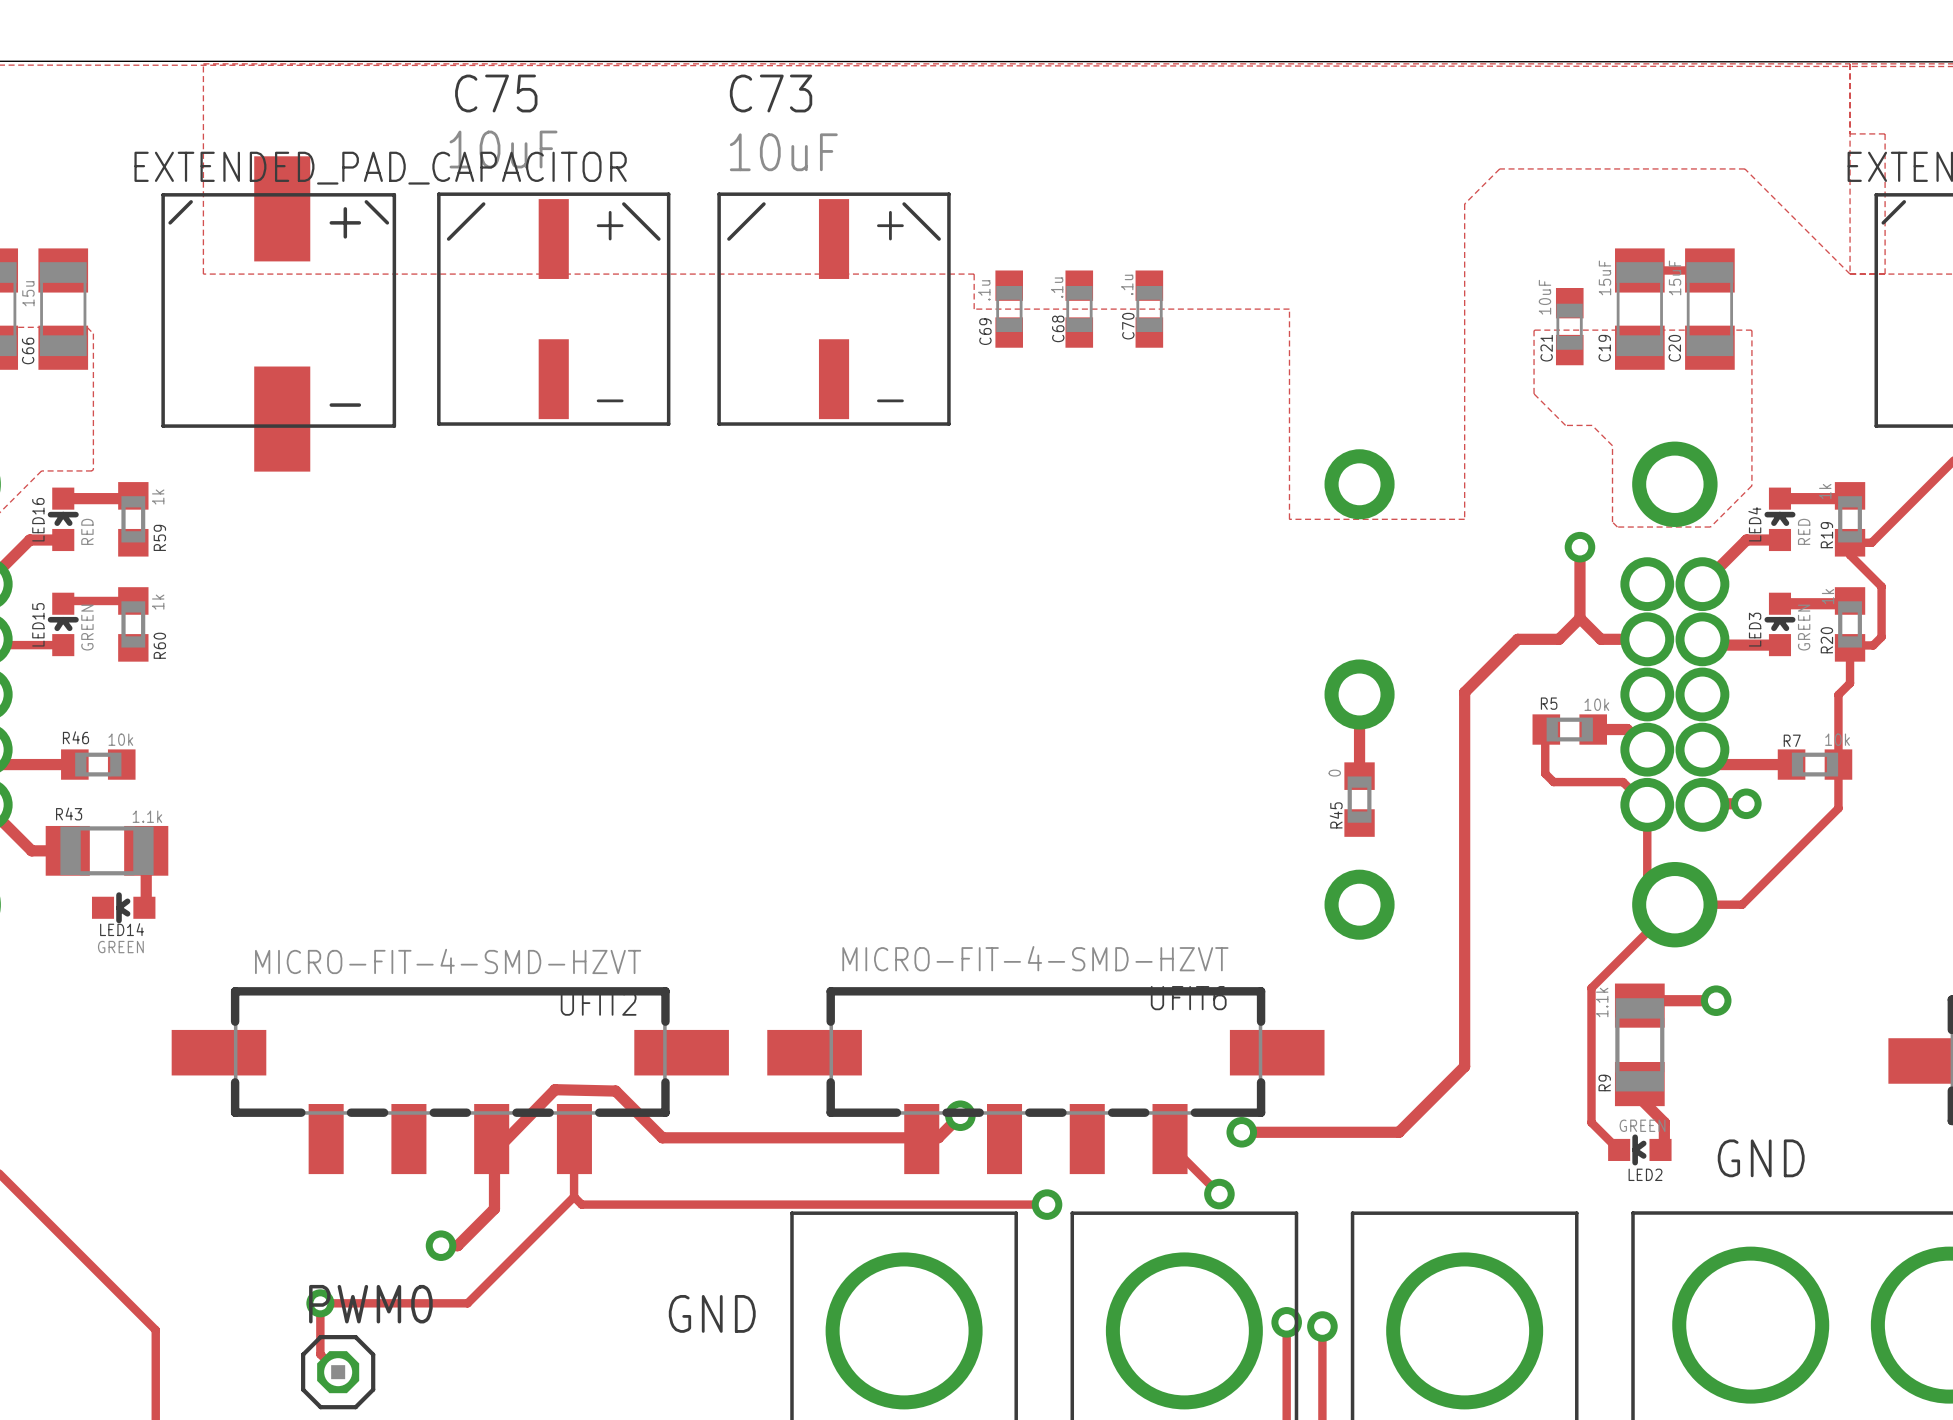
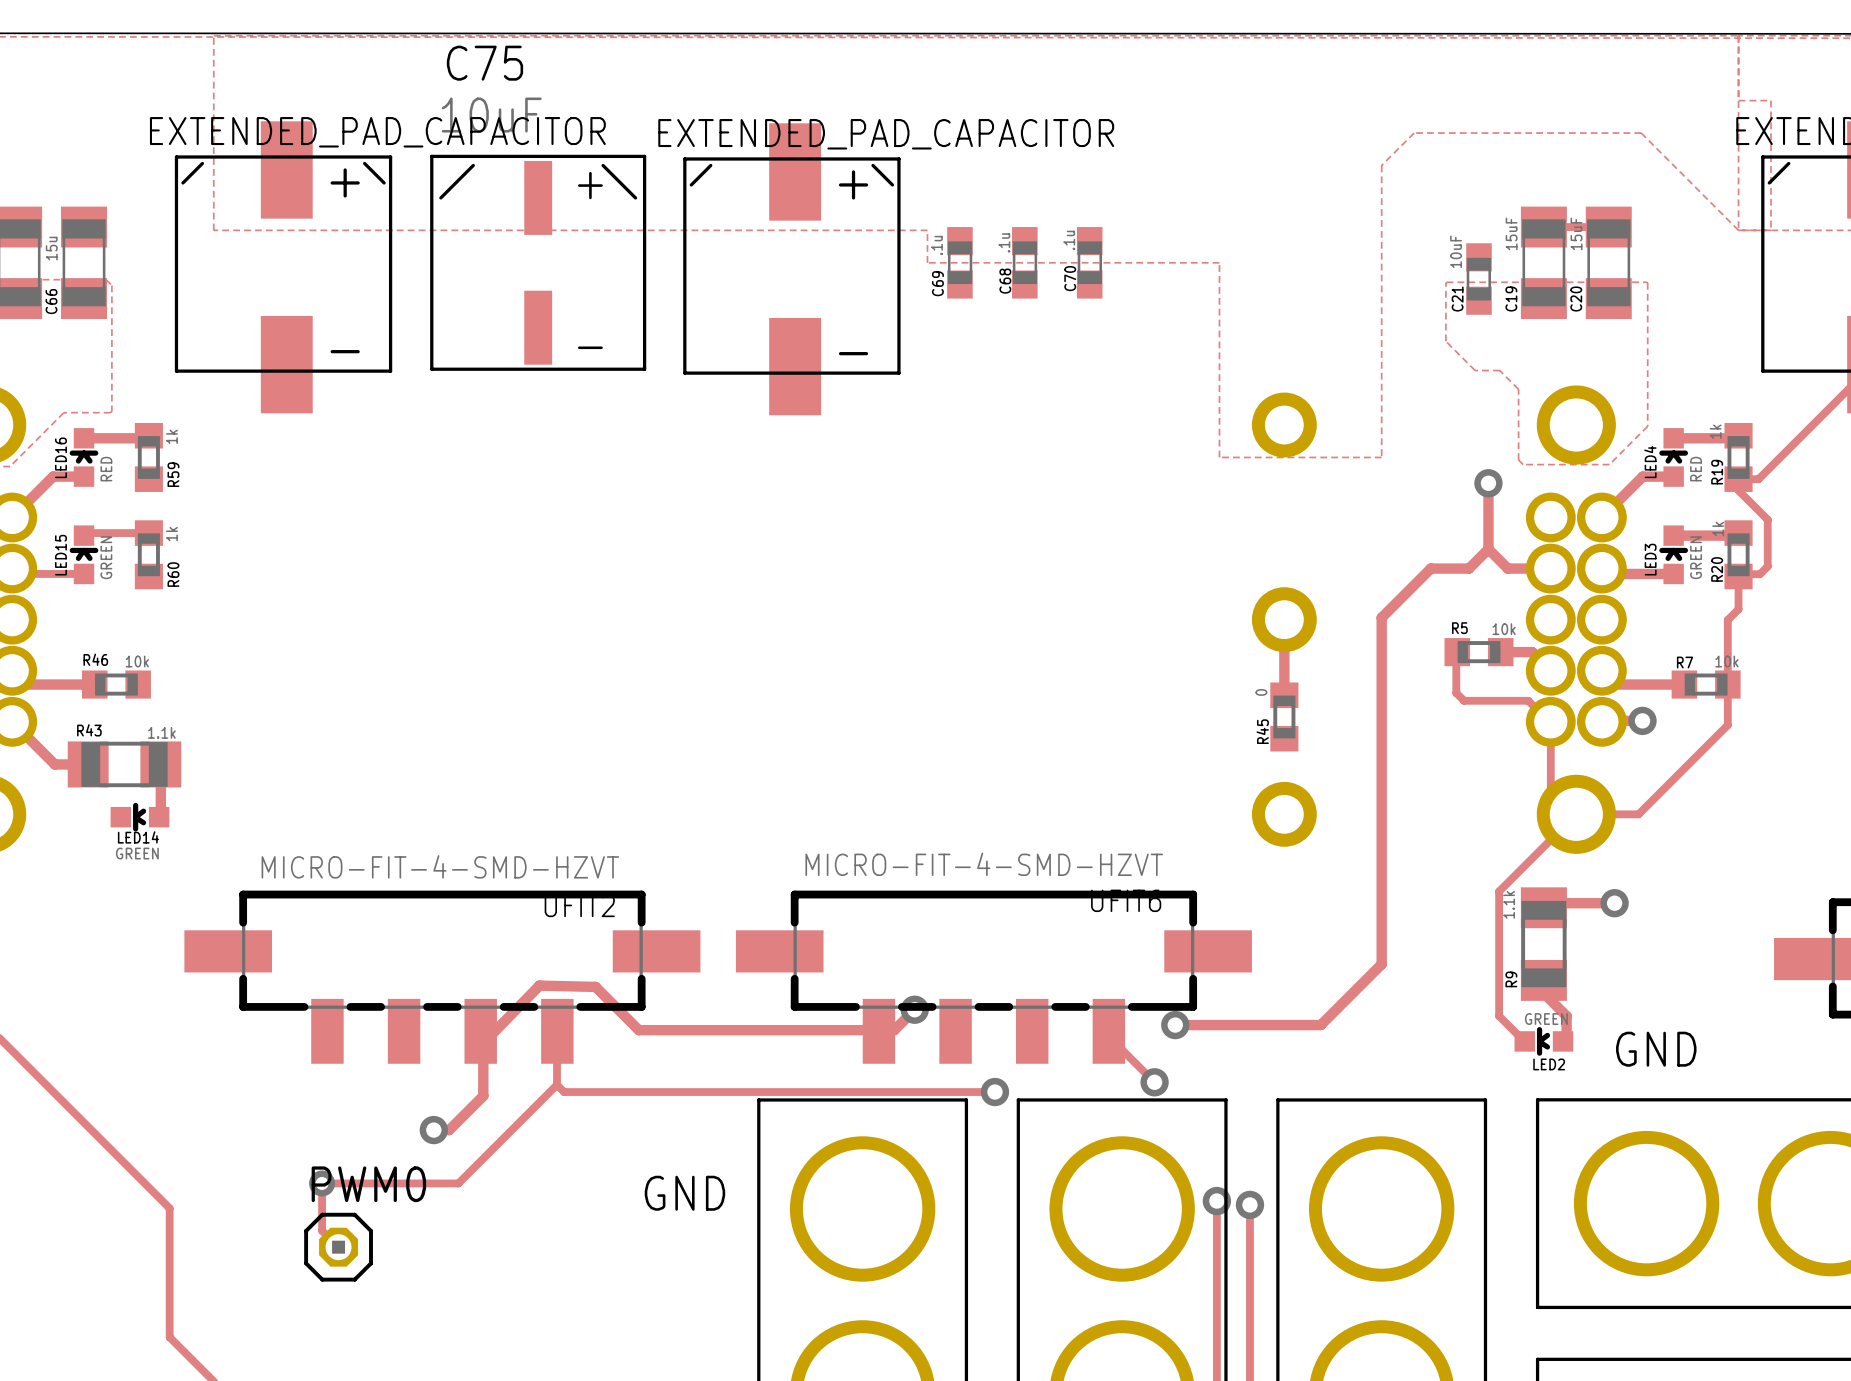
C73: 10uF (834, 309) -> none
part: none -> EXTENDED_PAD_CAPACITOR (791, 269)

